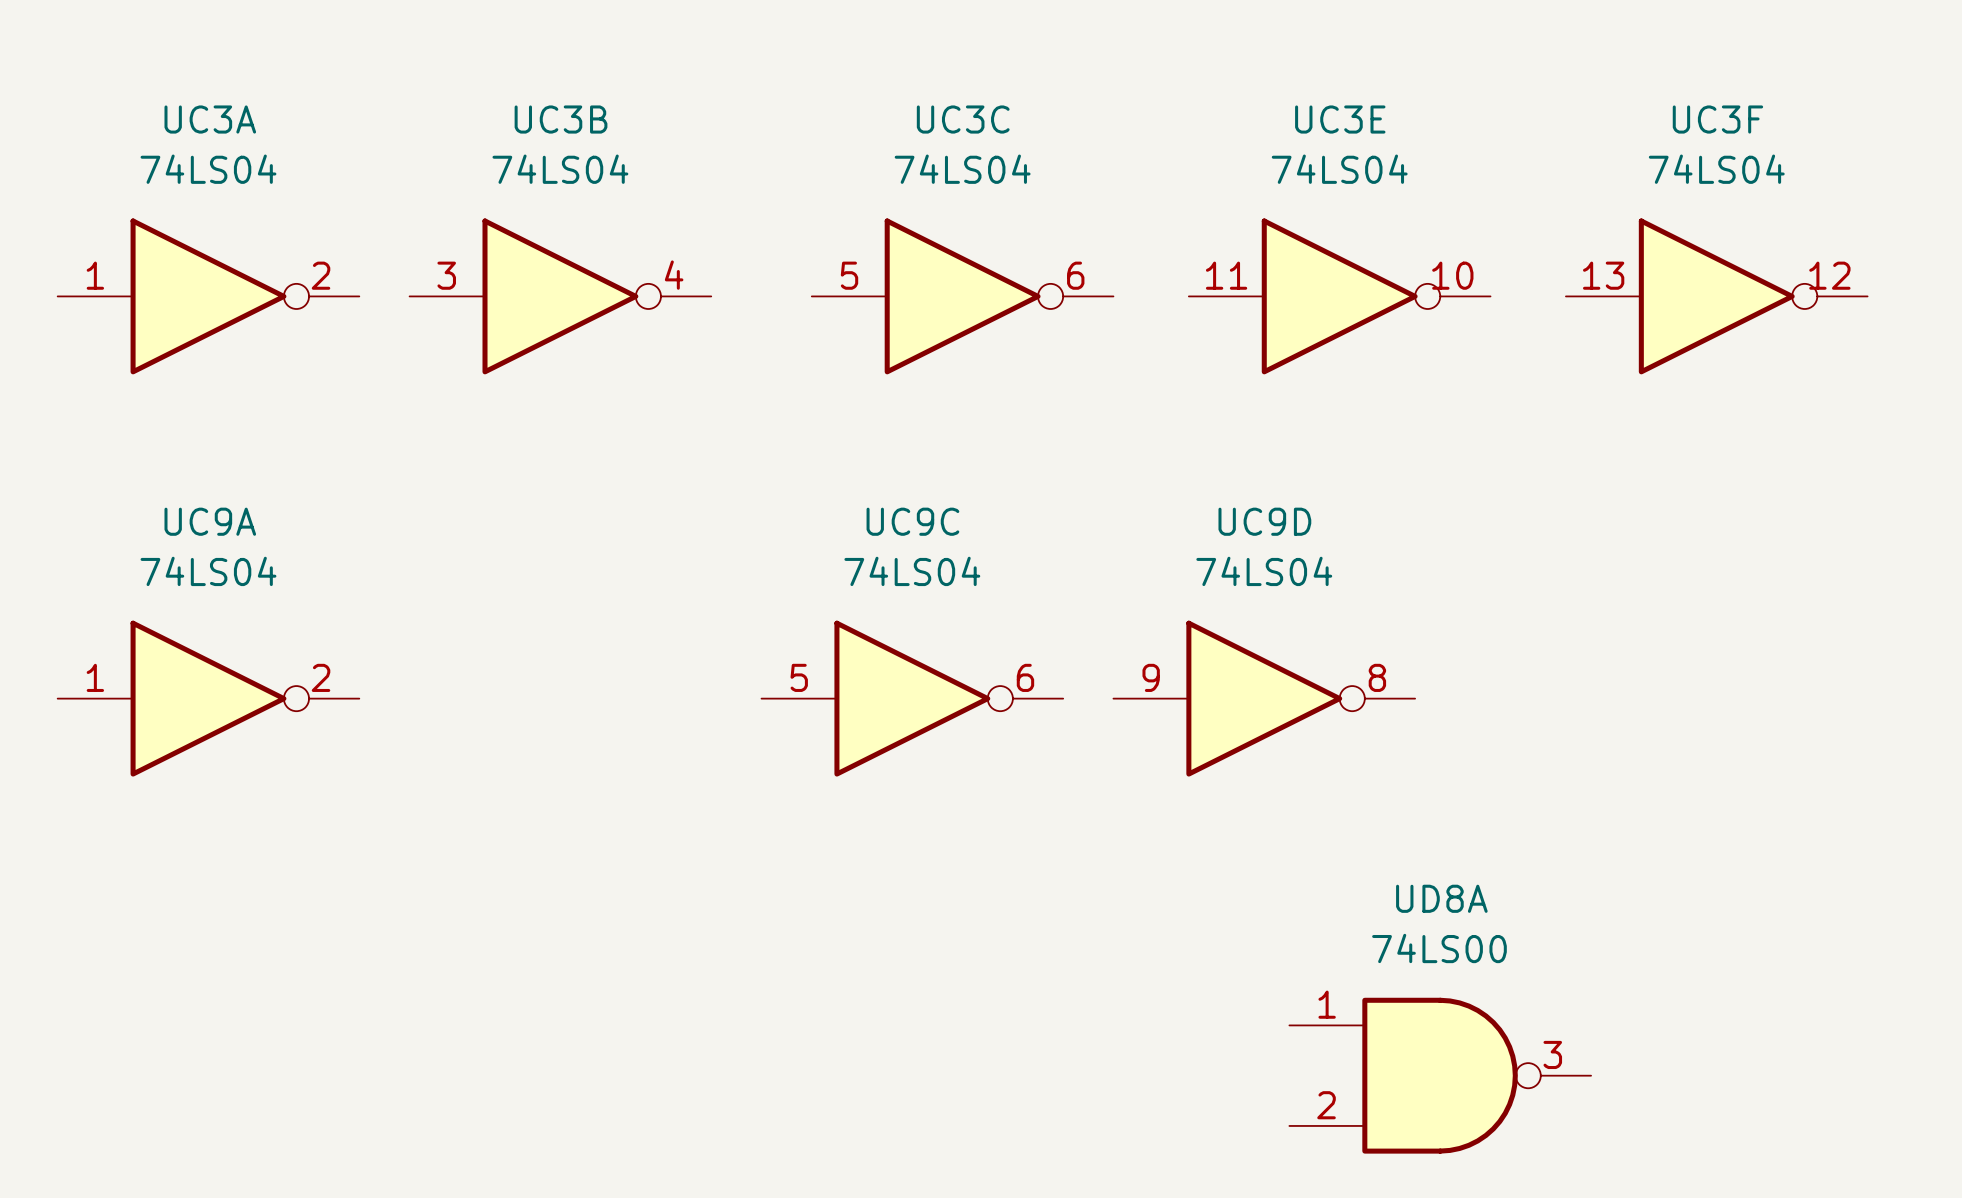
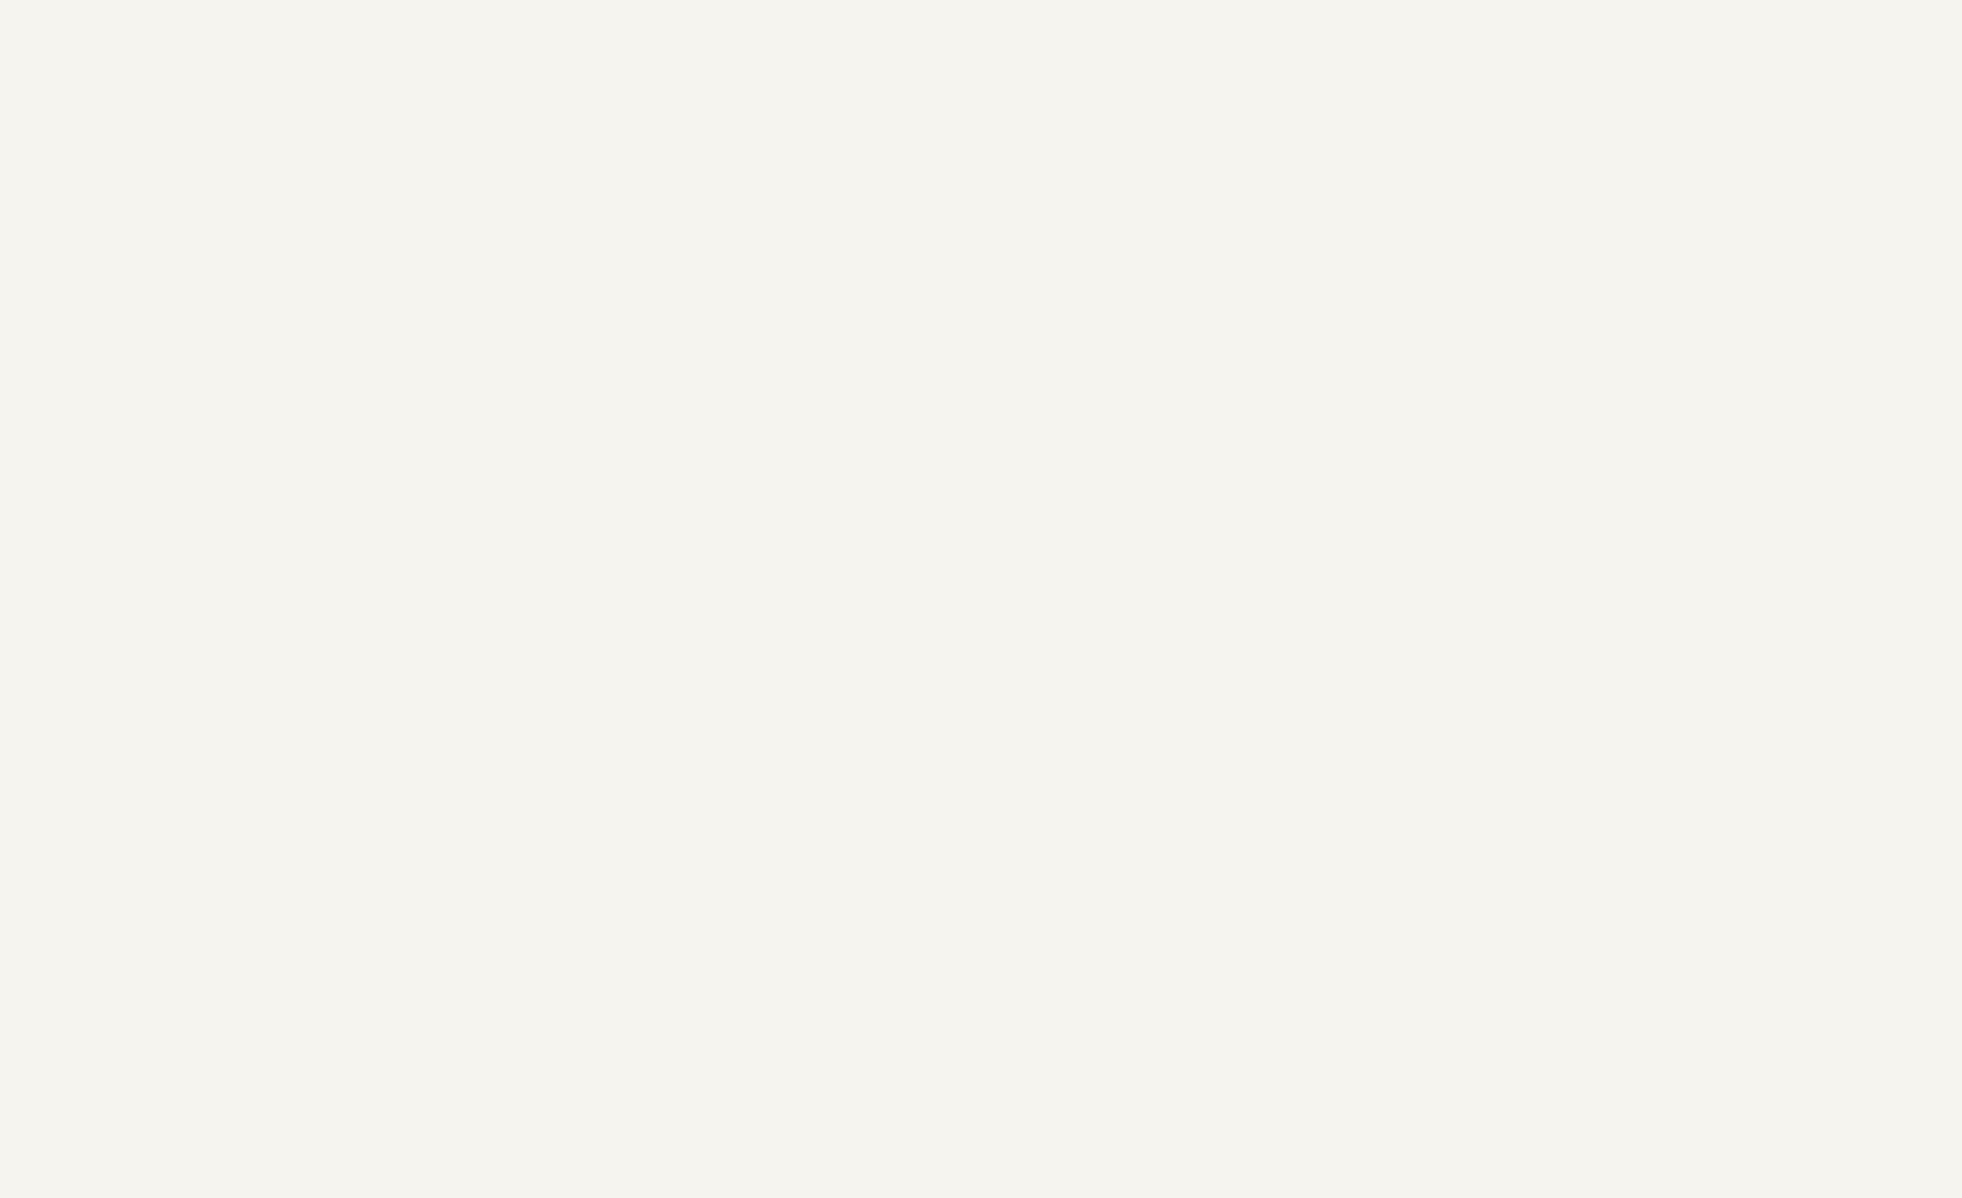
UC3A: 74LS04 (208, 296) -> none
UC3B: 74LS04 (560, 296) -> none
UC3C: 74LS04 (962, 296) -> none
UC3E: 74LS04 (1339, 296) -> none
UC3F: 74LS04 (1716, 296) -> none
UC9A: 74LS04 (208, 698) -> none
UC9C: 74LS04 (912, 698) -> none
UC9D: 74LS04 (1264, 698) -> none
UD8A: 74LS00 (1440, 1075) -> none

